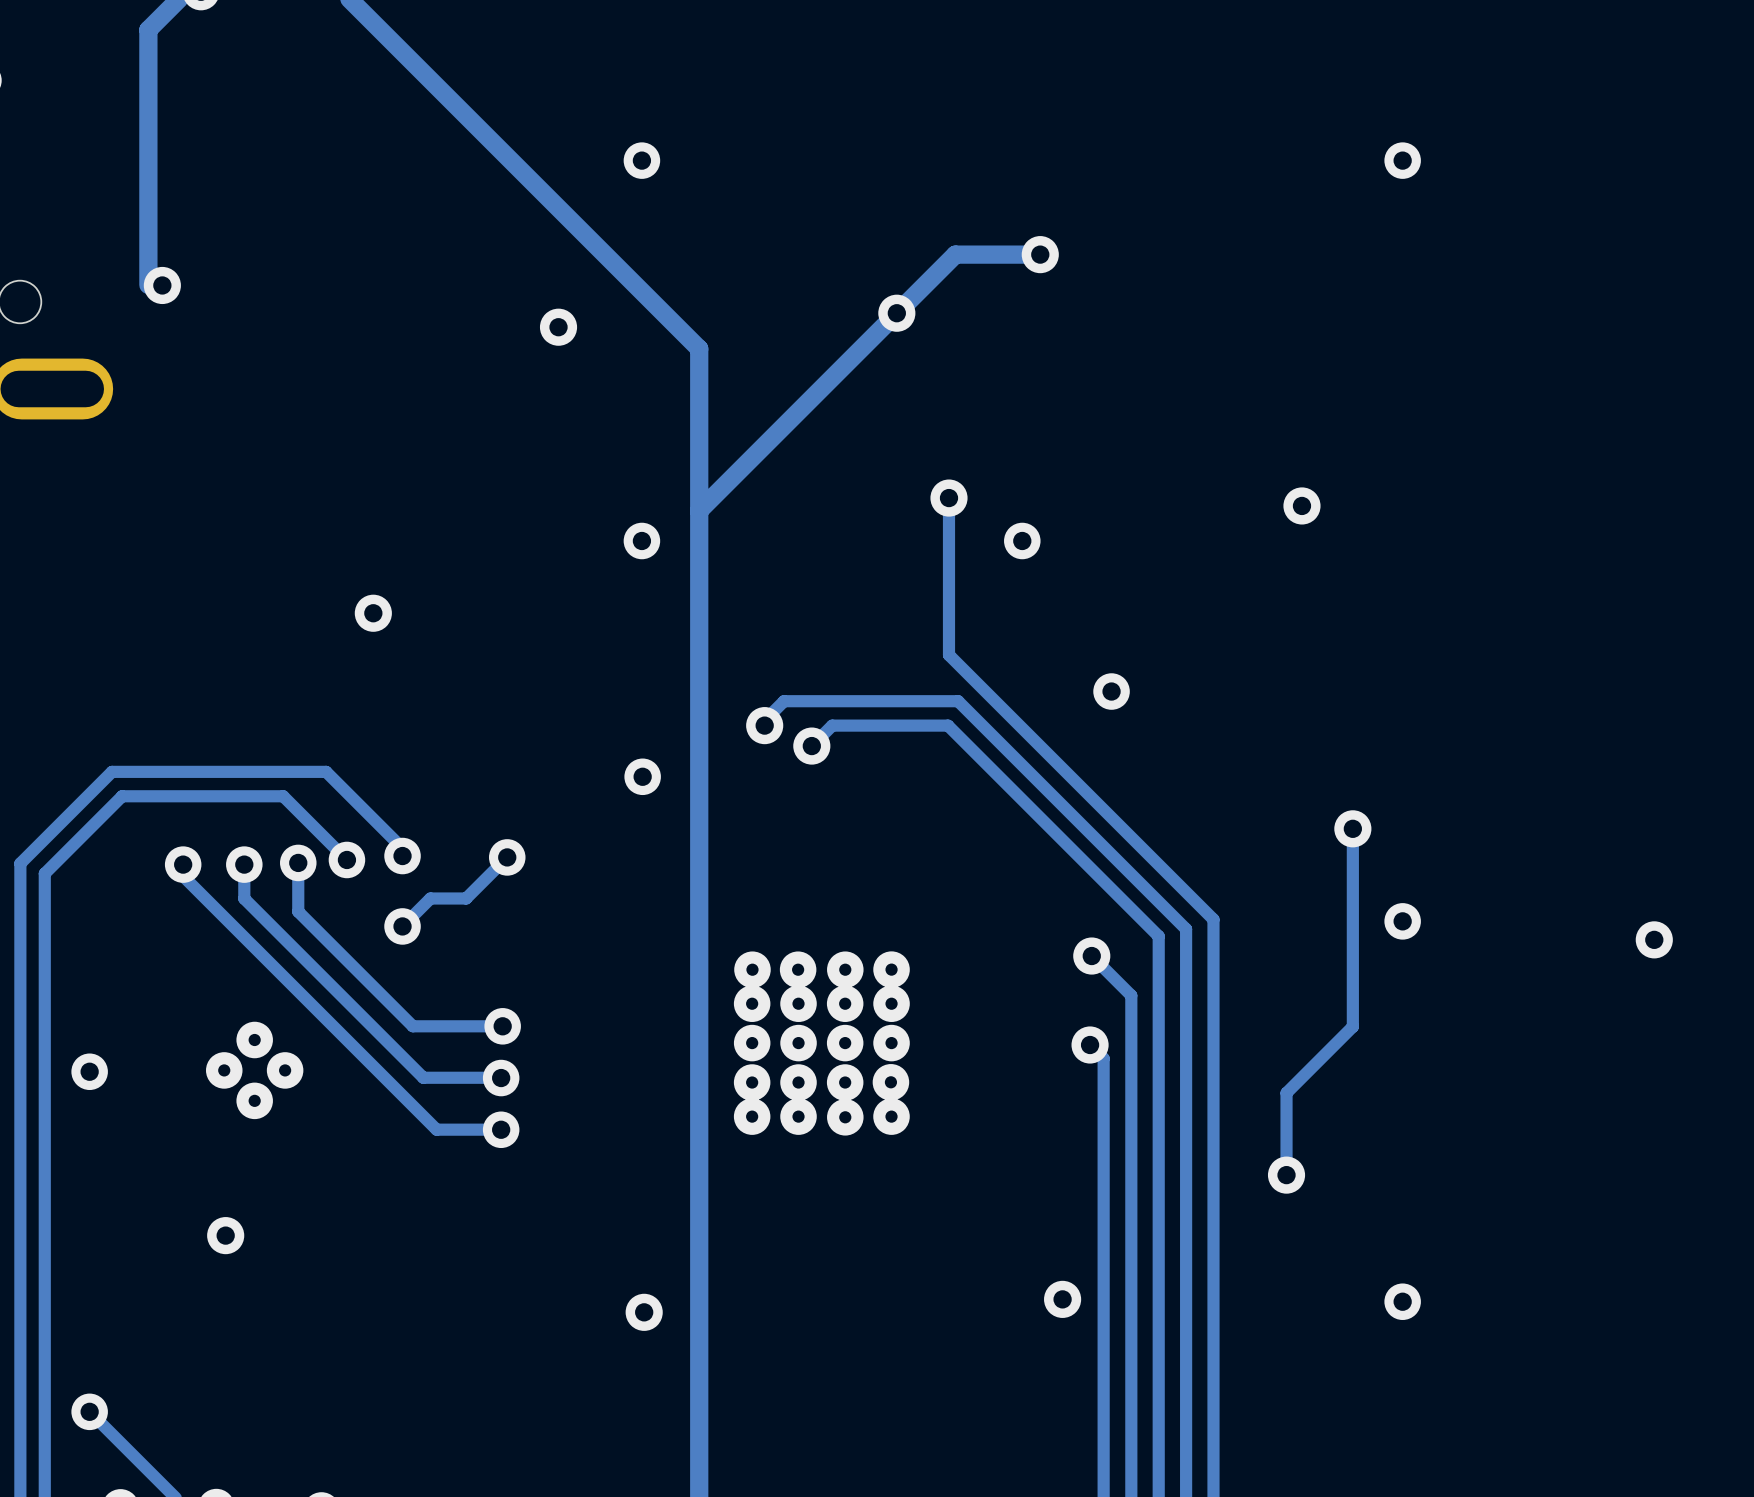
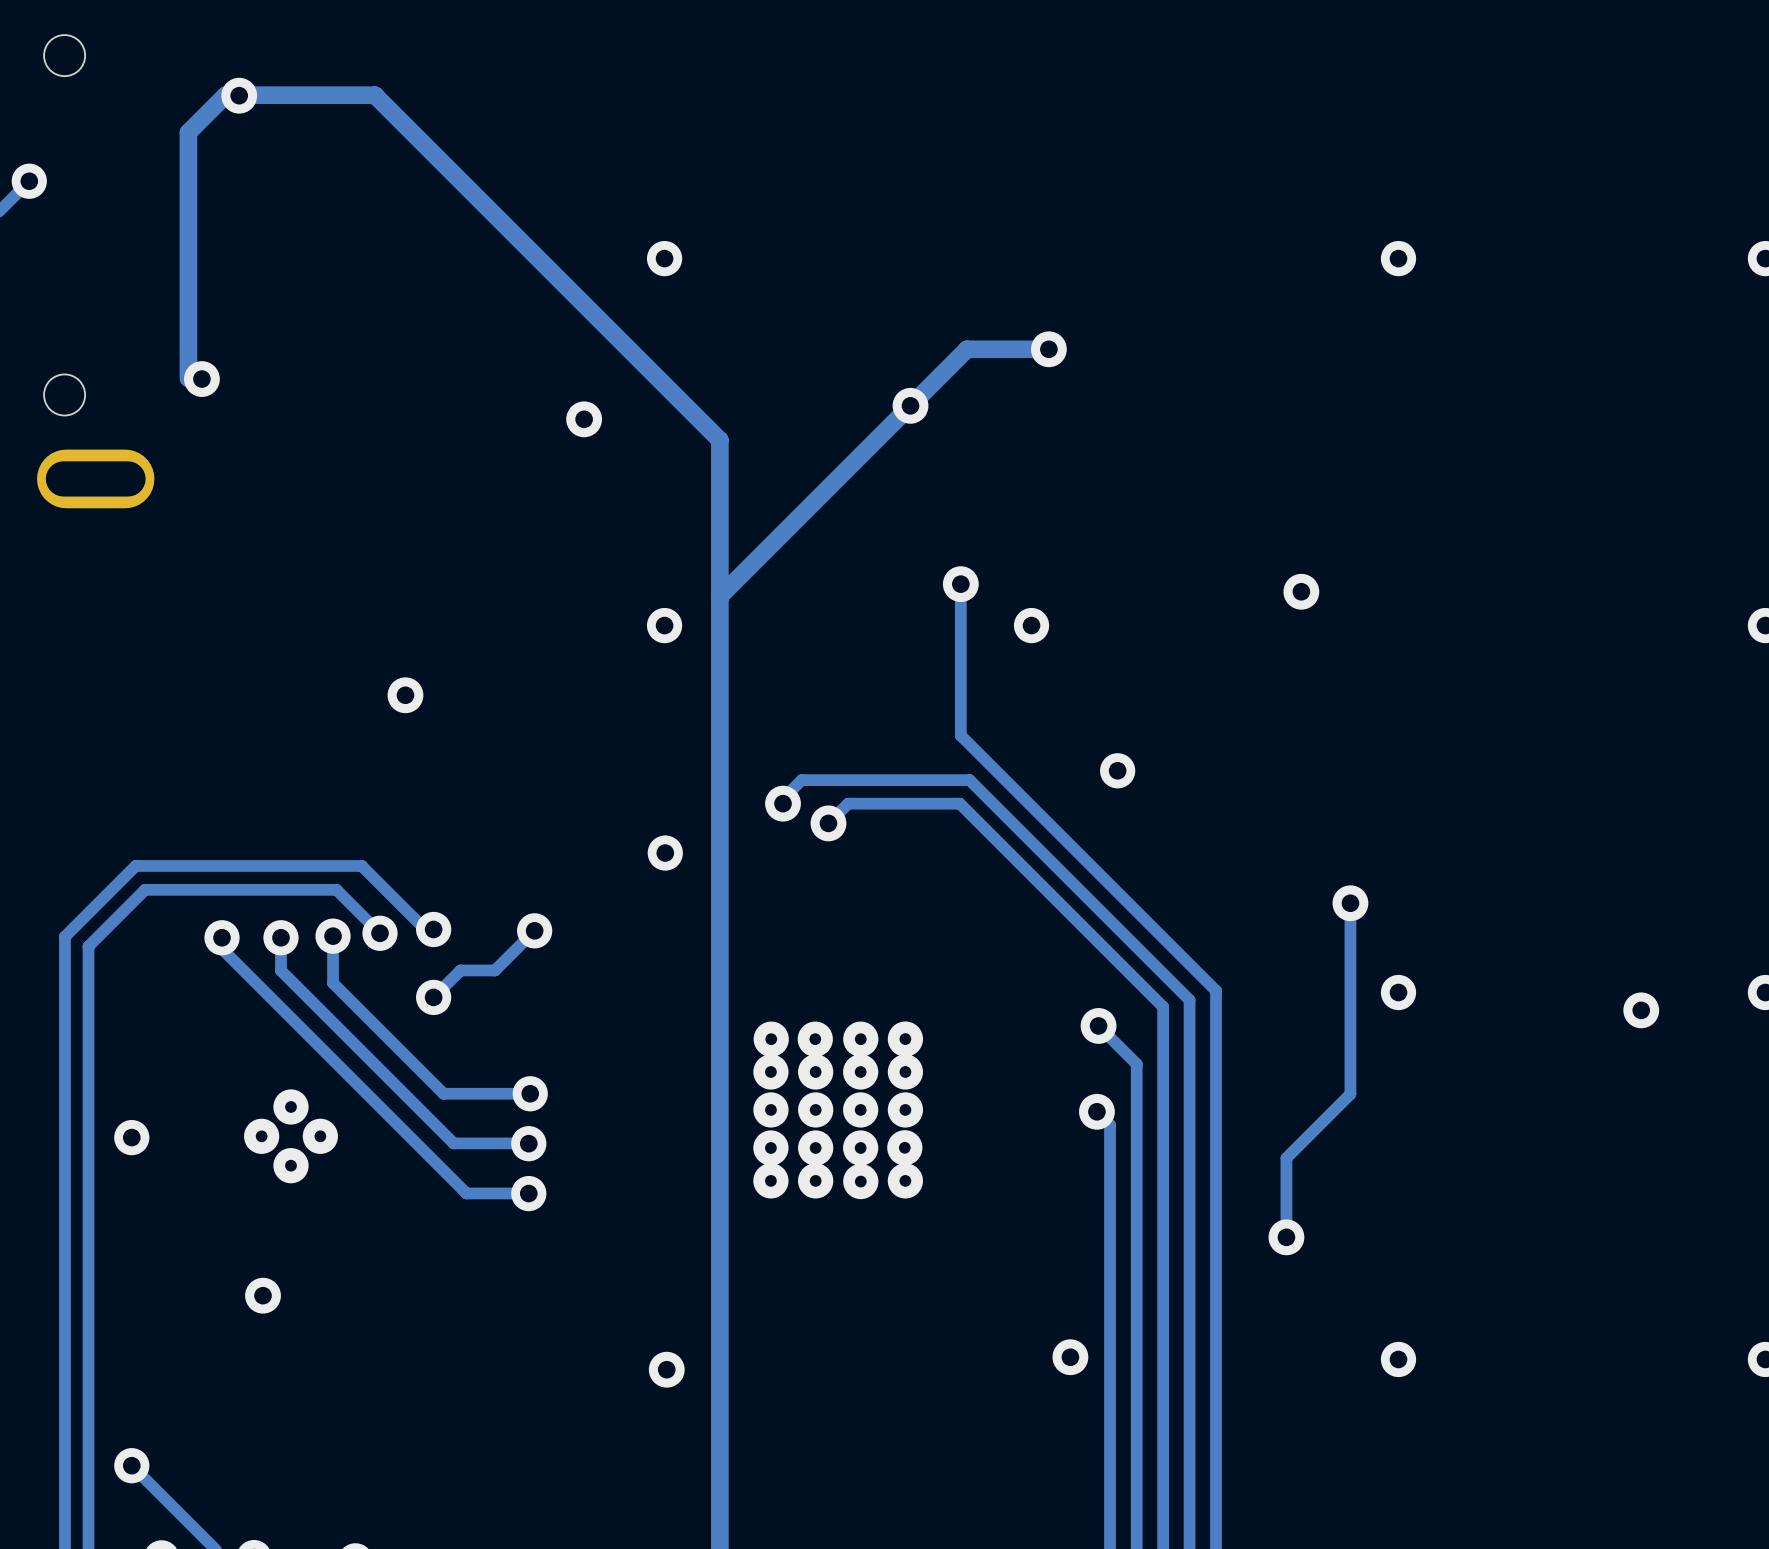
track: (93, 790) (112, 771) (326, 771) (402, 848) (402, 856) -> (135, 865) (361, 865) (433, 937)
track: (301, 814) (283, 796) (122, 796) (103, 814) -> (336, 889) (145, 889)

